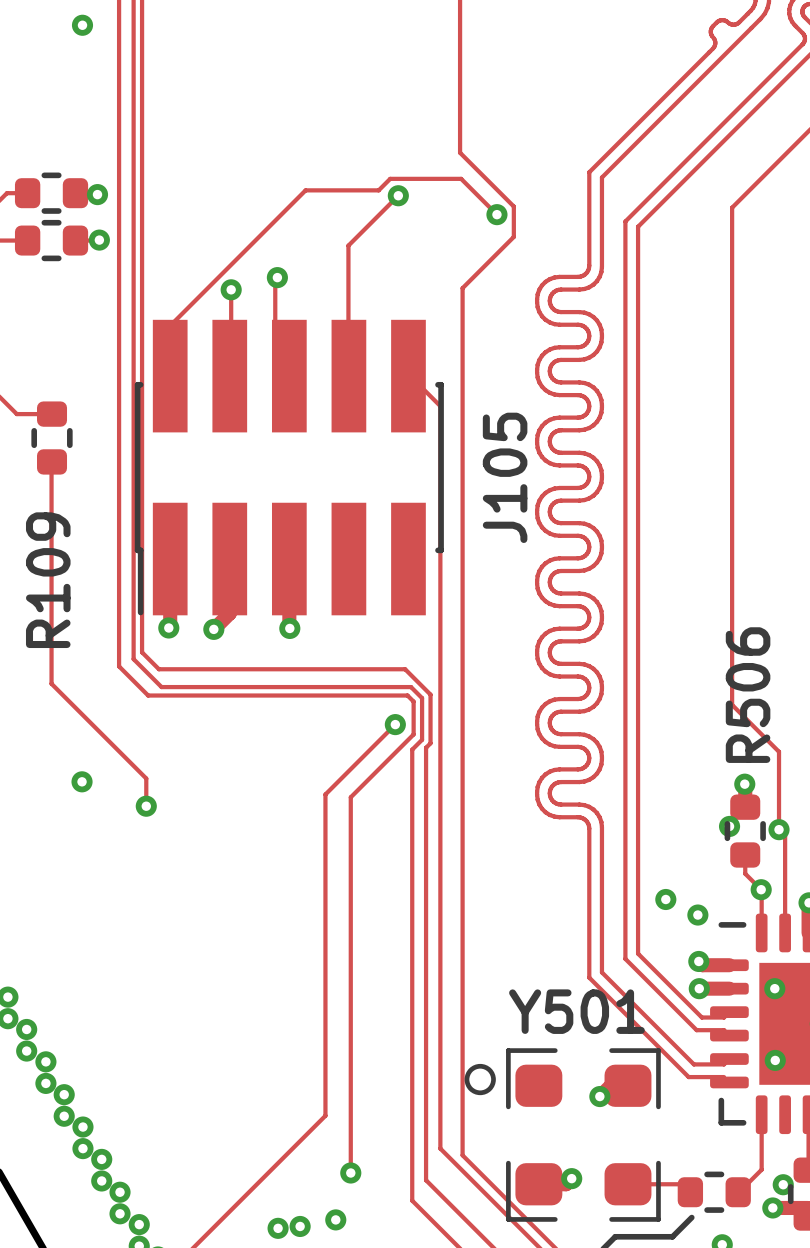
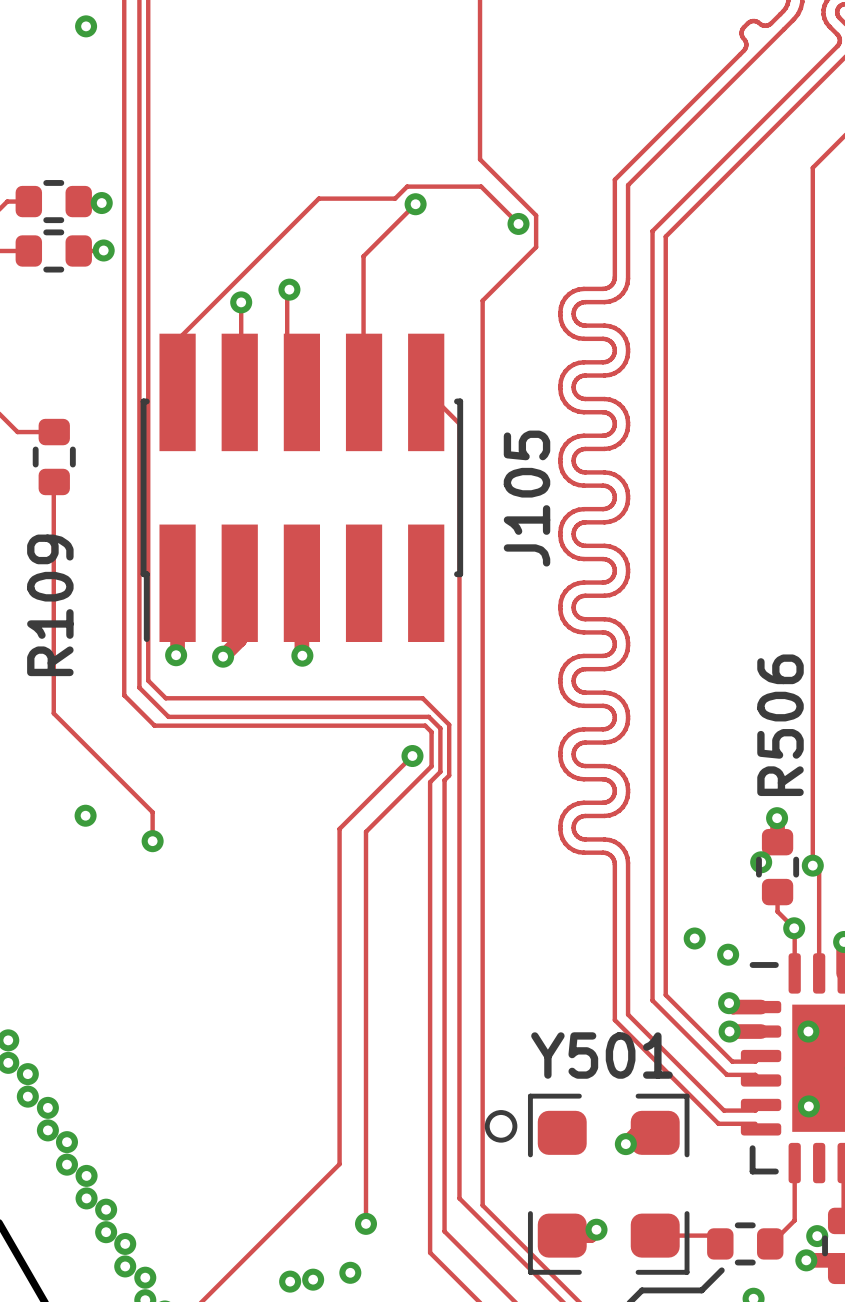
track: (779, 160) (732, 207) (732, 704) (779, 751) -> (812, 167) (812, 784)

